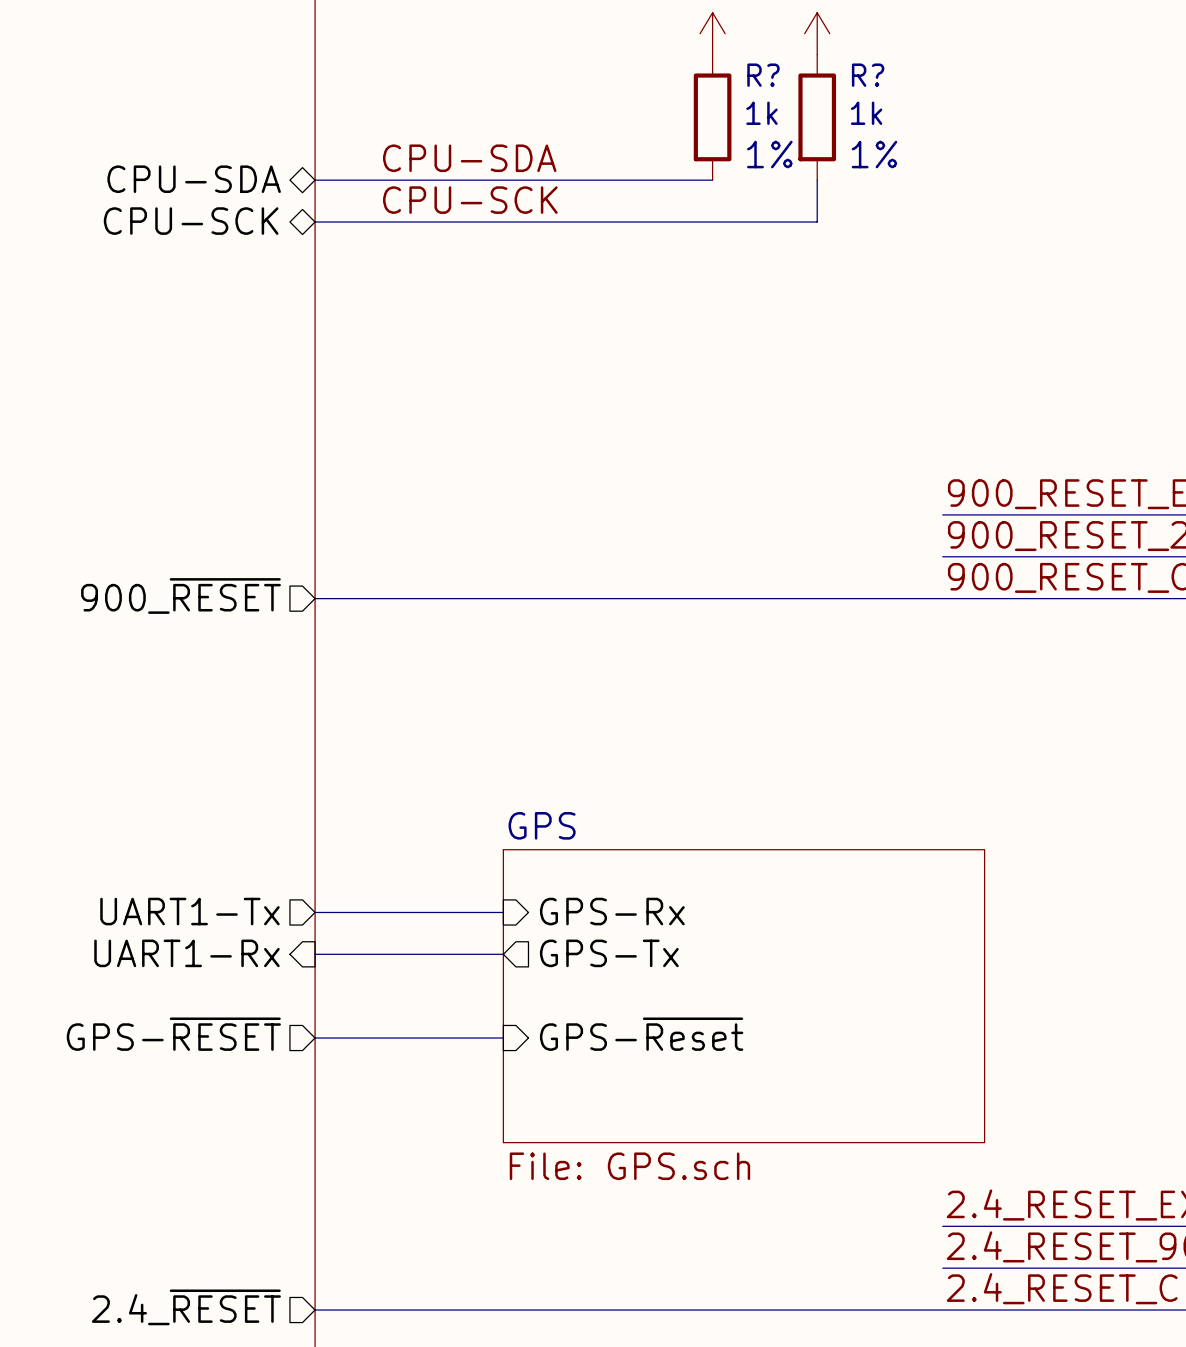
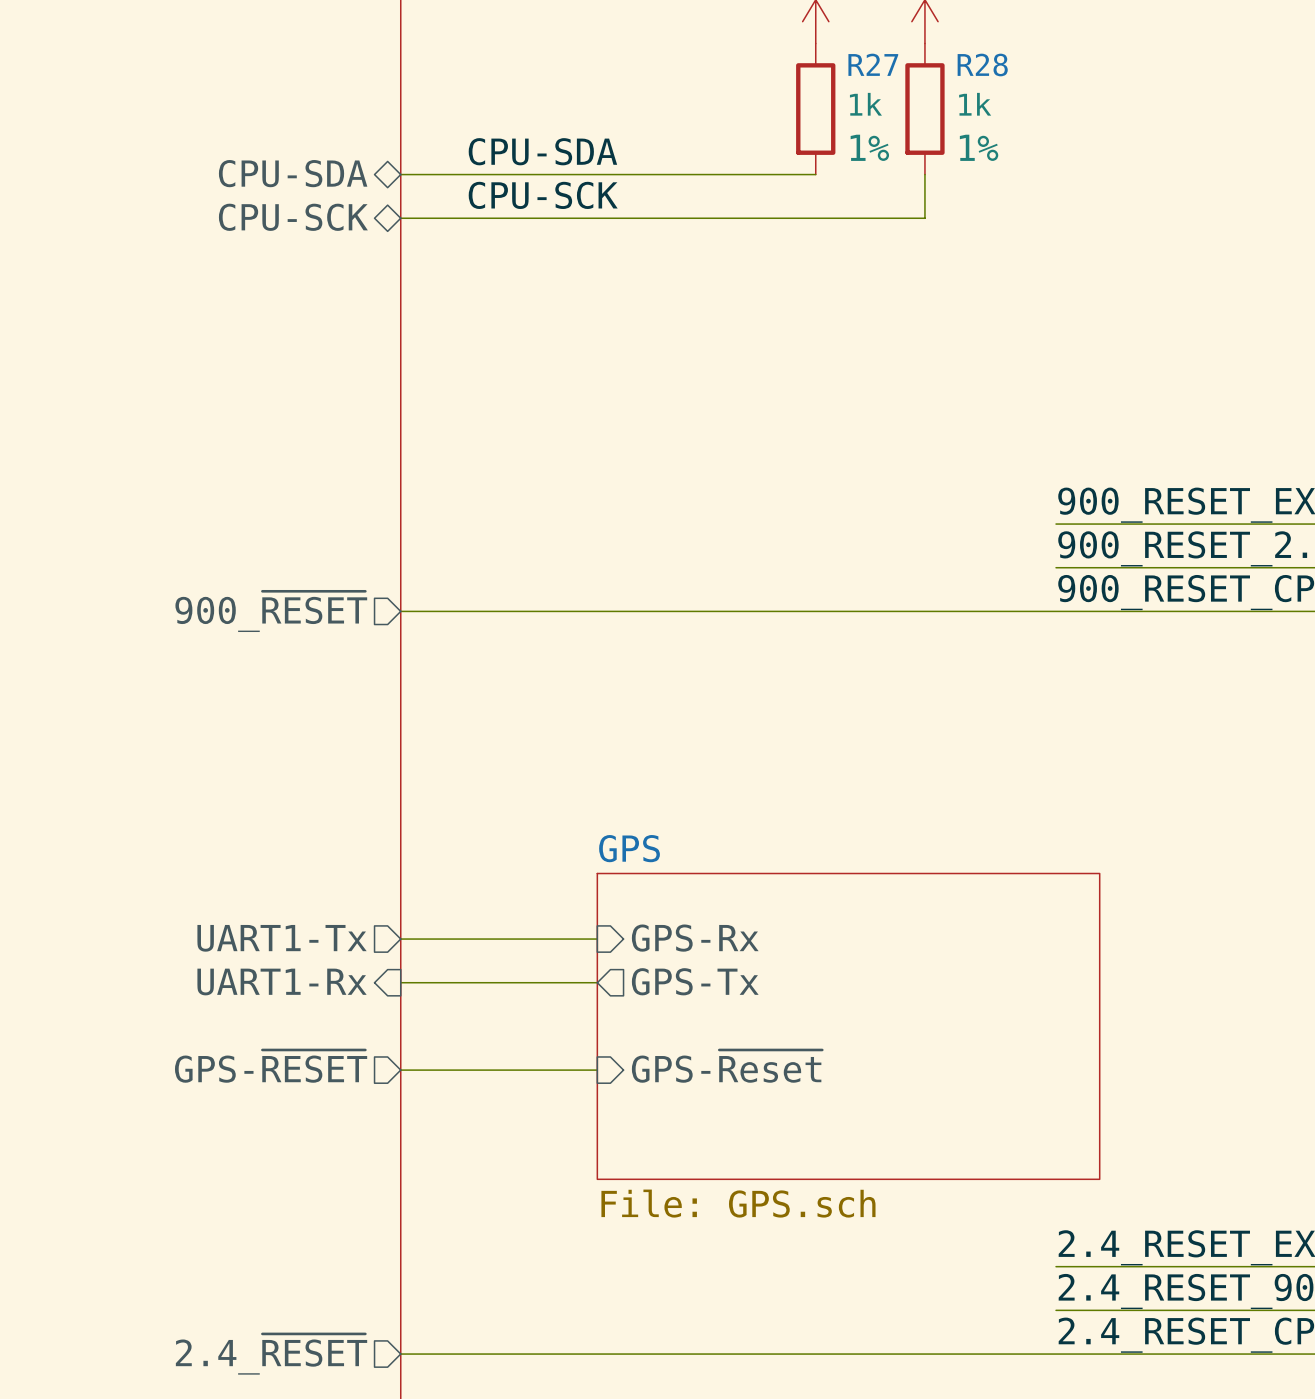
R? name: R? (763, 75) -> R27 (873, 64)
R? name: R? (868, 75) -> R28 (982, 64)

